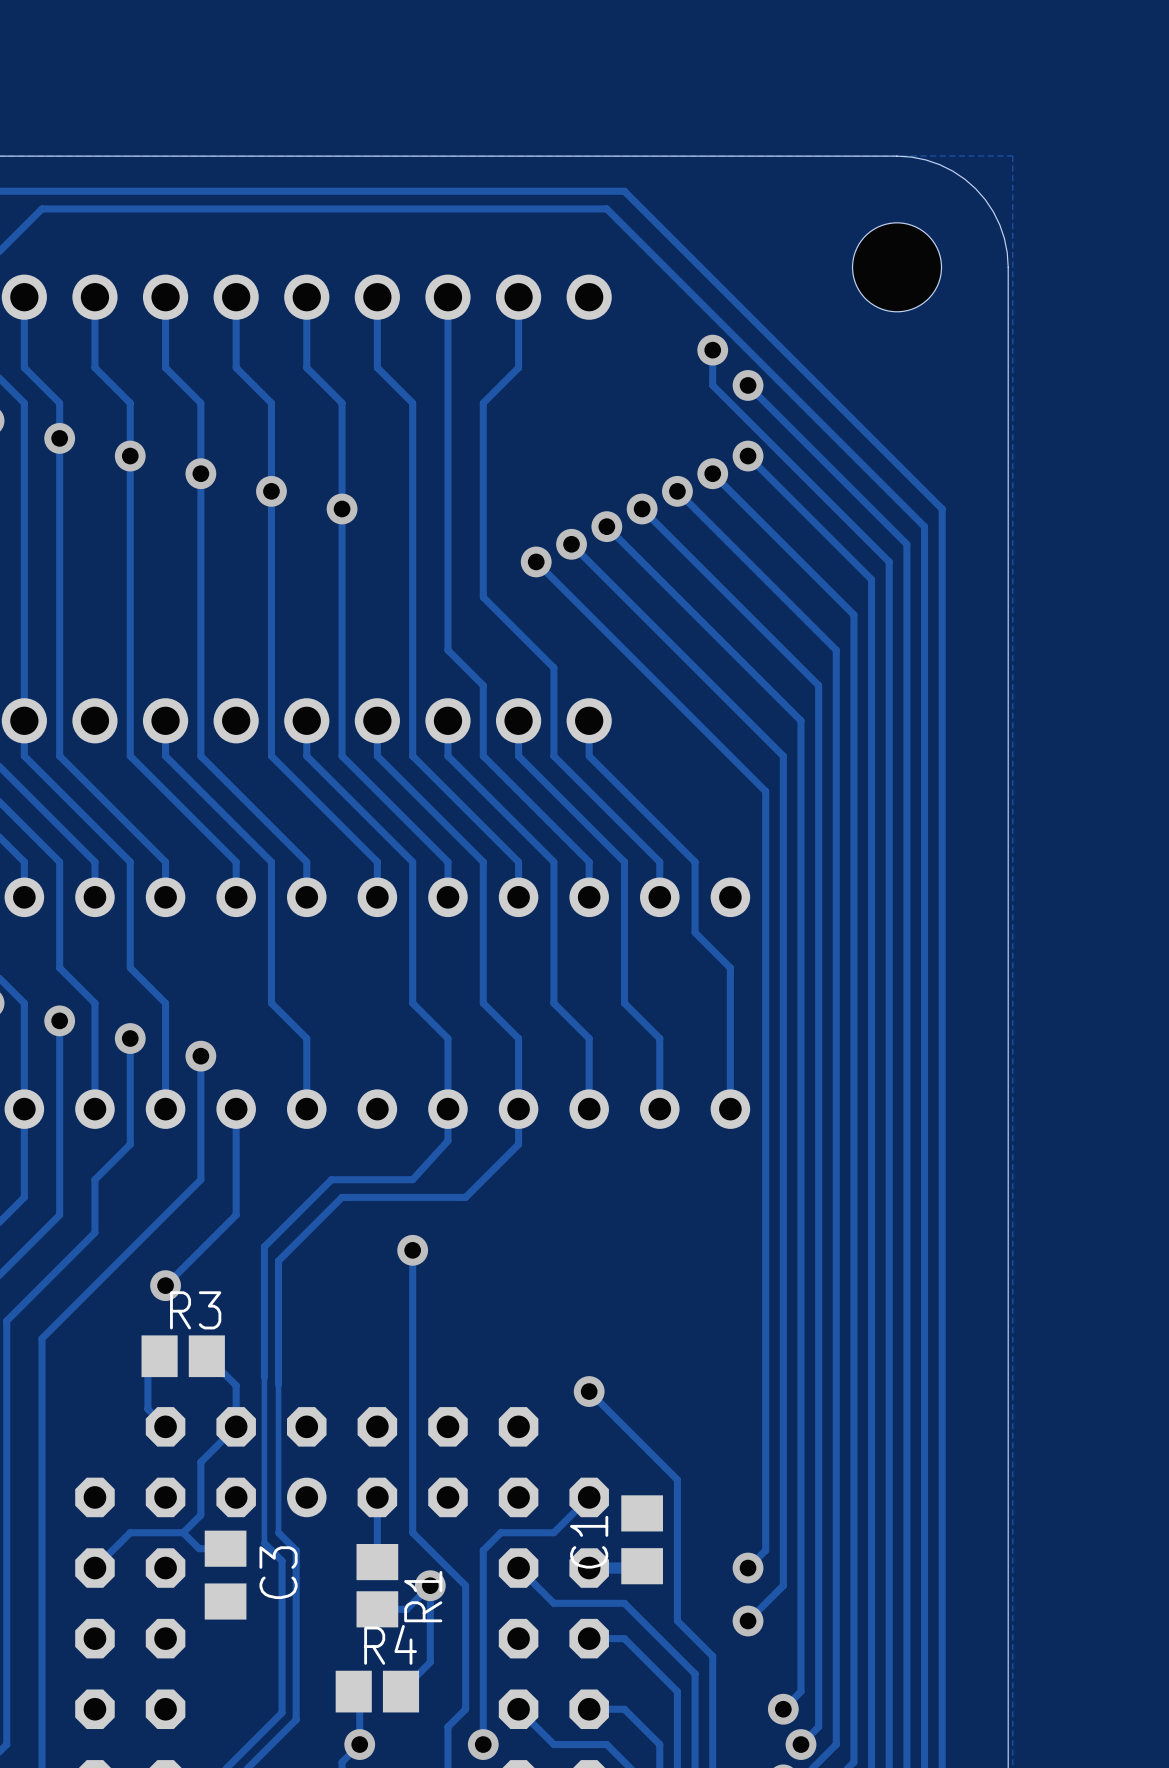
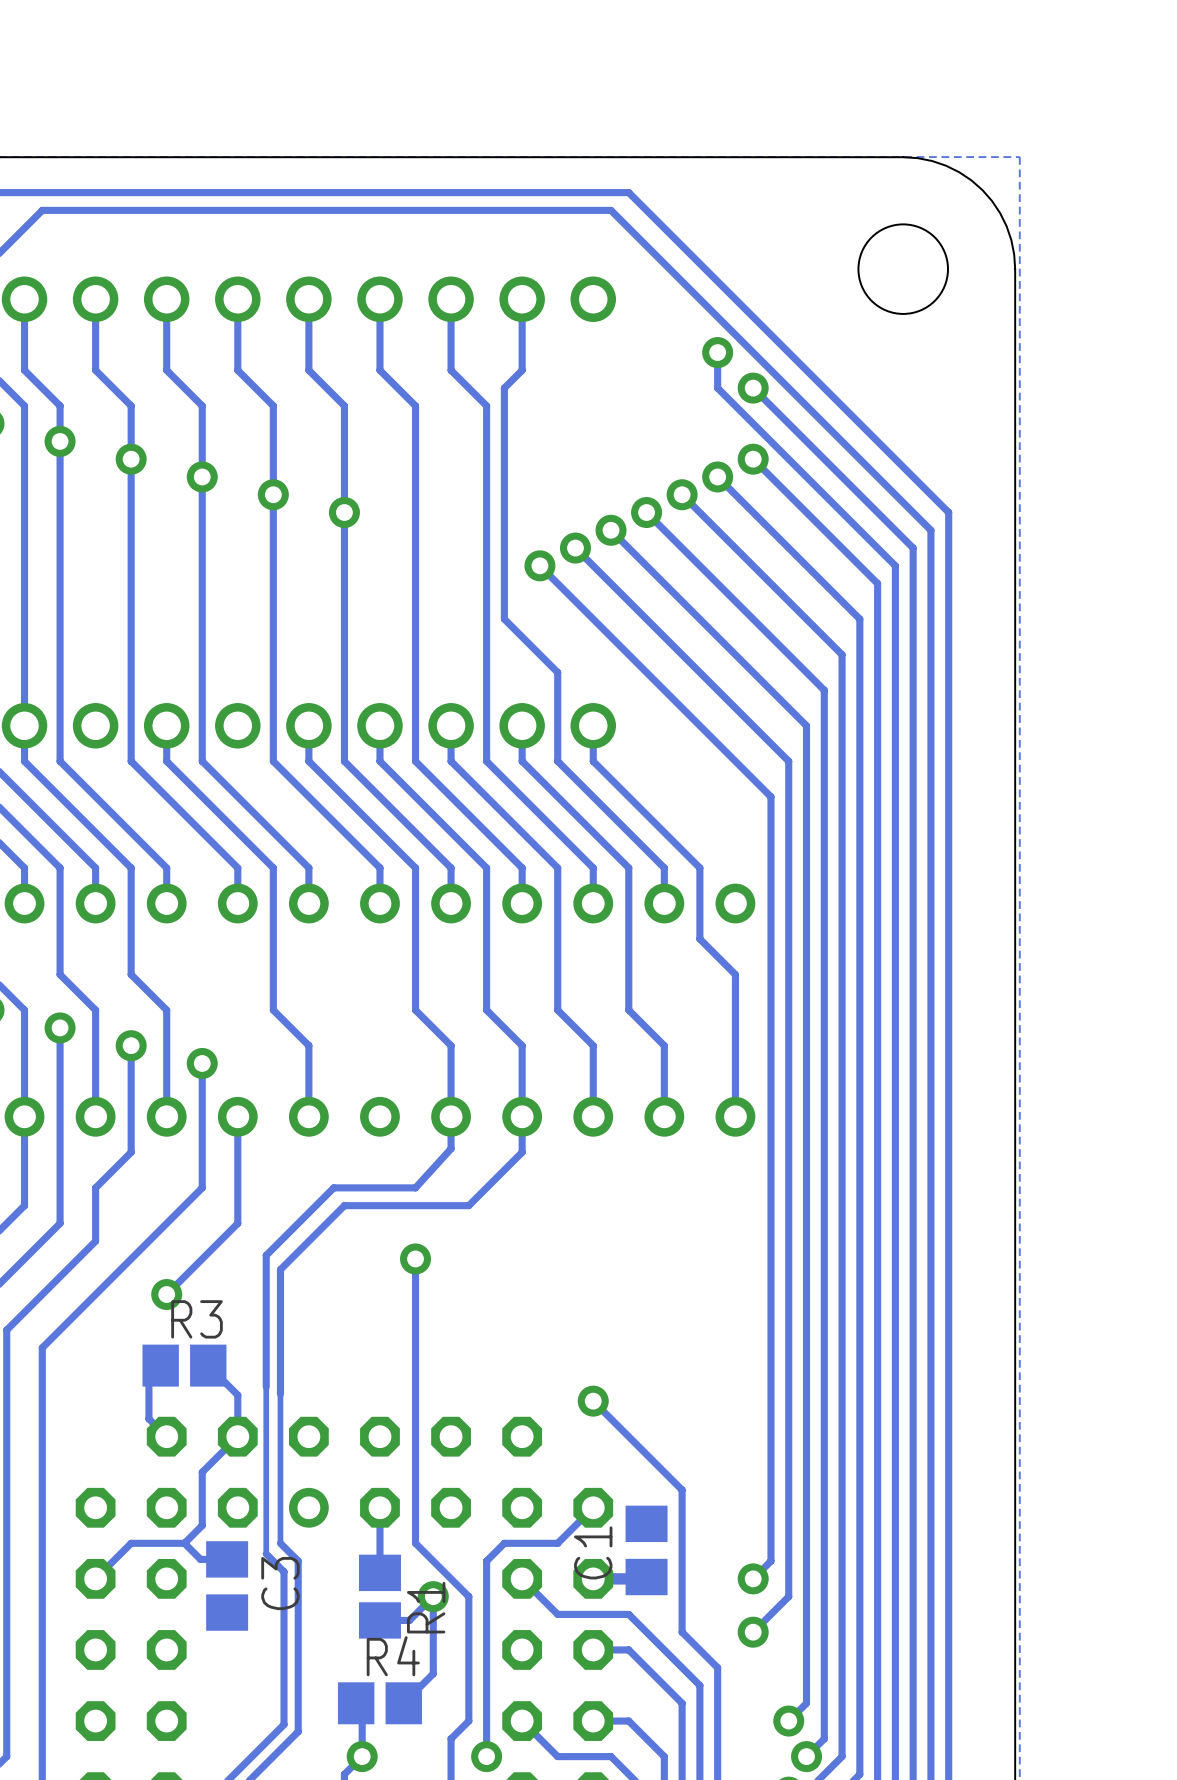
track: (447, 367) (447, 650) (483, 685) -> none
track: (500, 385) (483, 403) -> (451, 370) (486, 405)
track: none -> (504, 388) (504, 619)
track: (483, 597) (500, 614) -> (486, 601) (486, 690)

